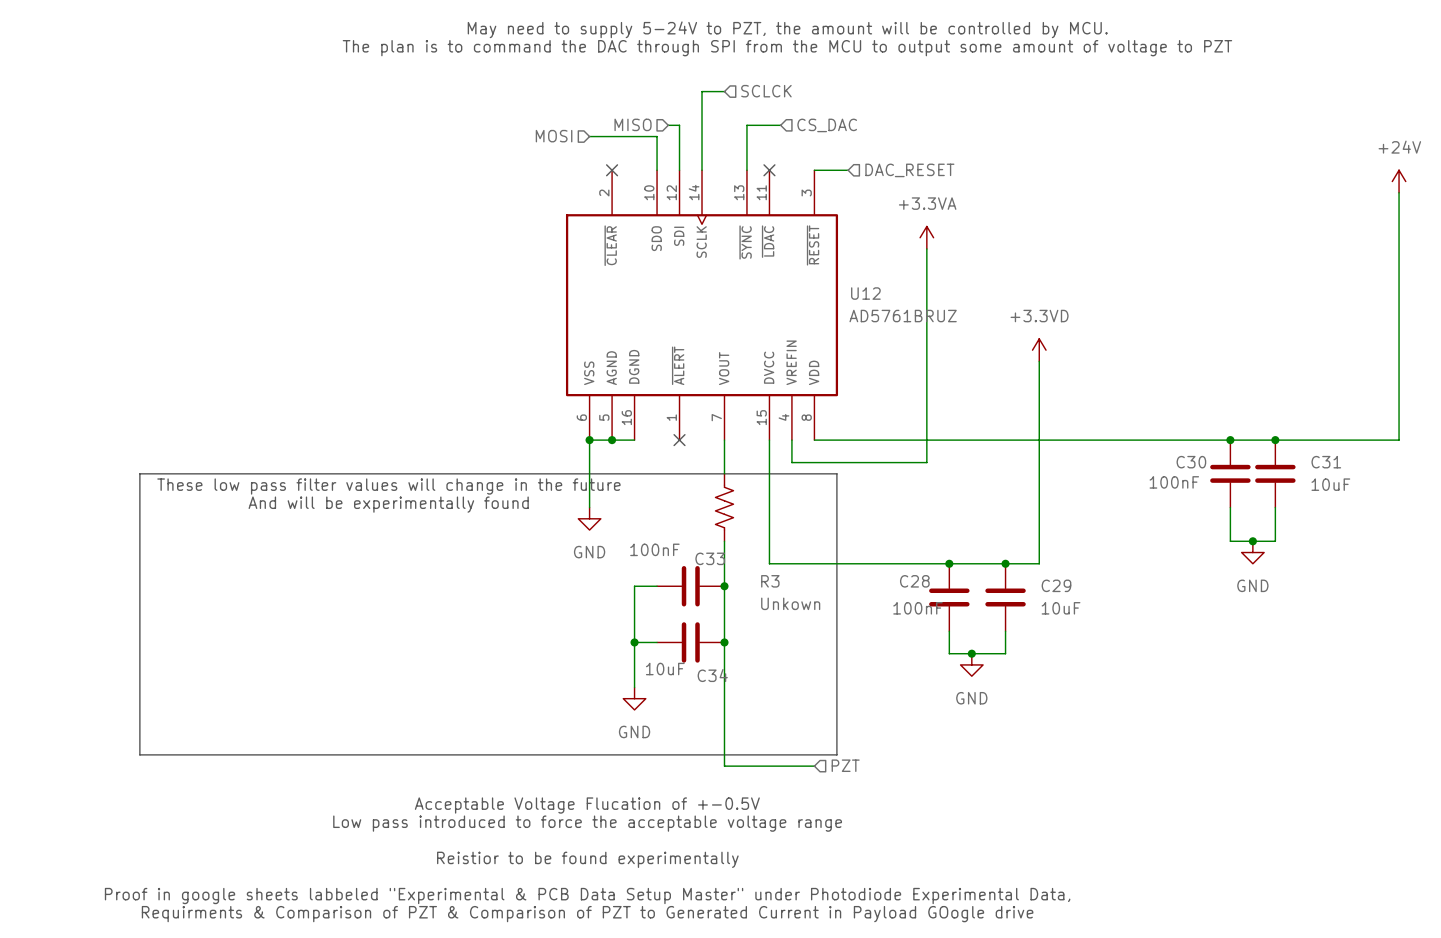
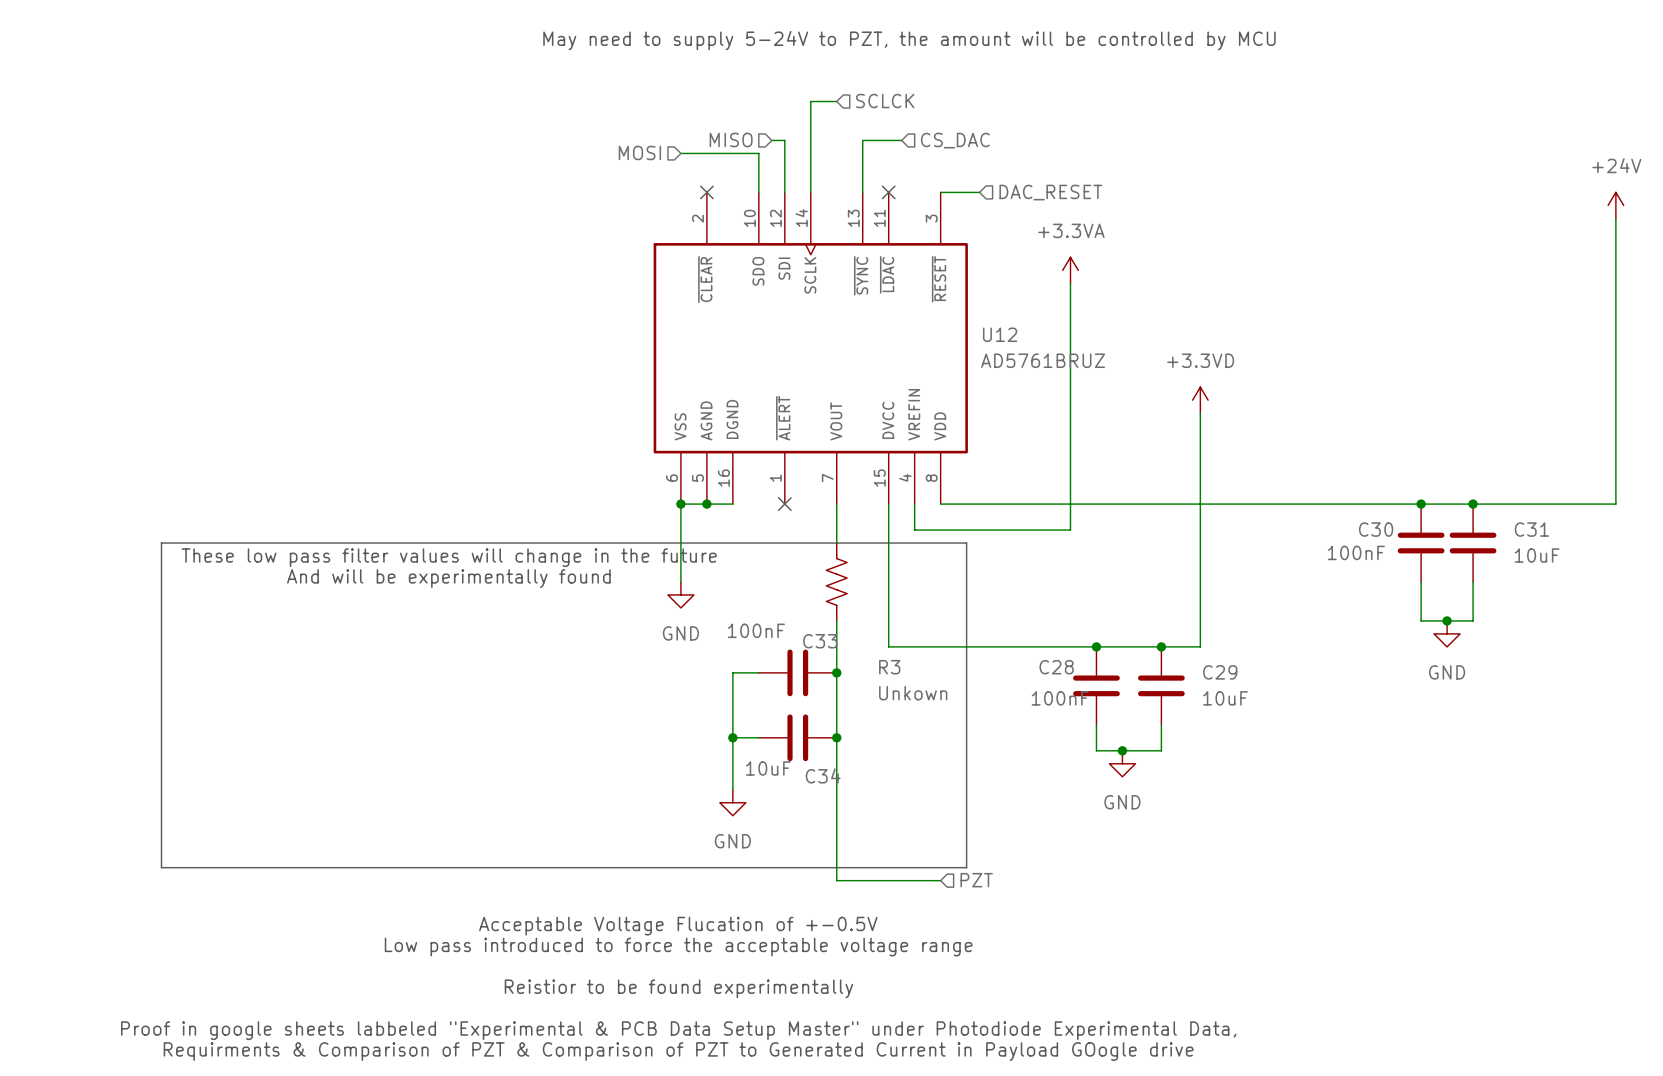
text: May need to supply 5-24V to PZT, the amount will be controlled by MCU. (787, 29) -> May need to supply 5-24V to PZT, the amount will be controlled by MCU (909, 40)
text: The plan is to command the DAC through SPI from the MCU to output some amount of voltage to PZT (787, 48) -> none

